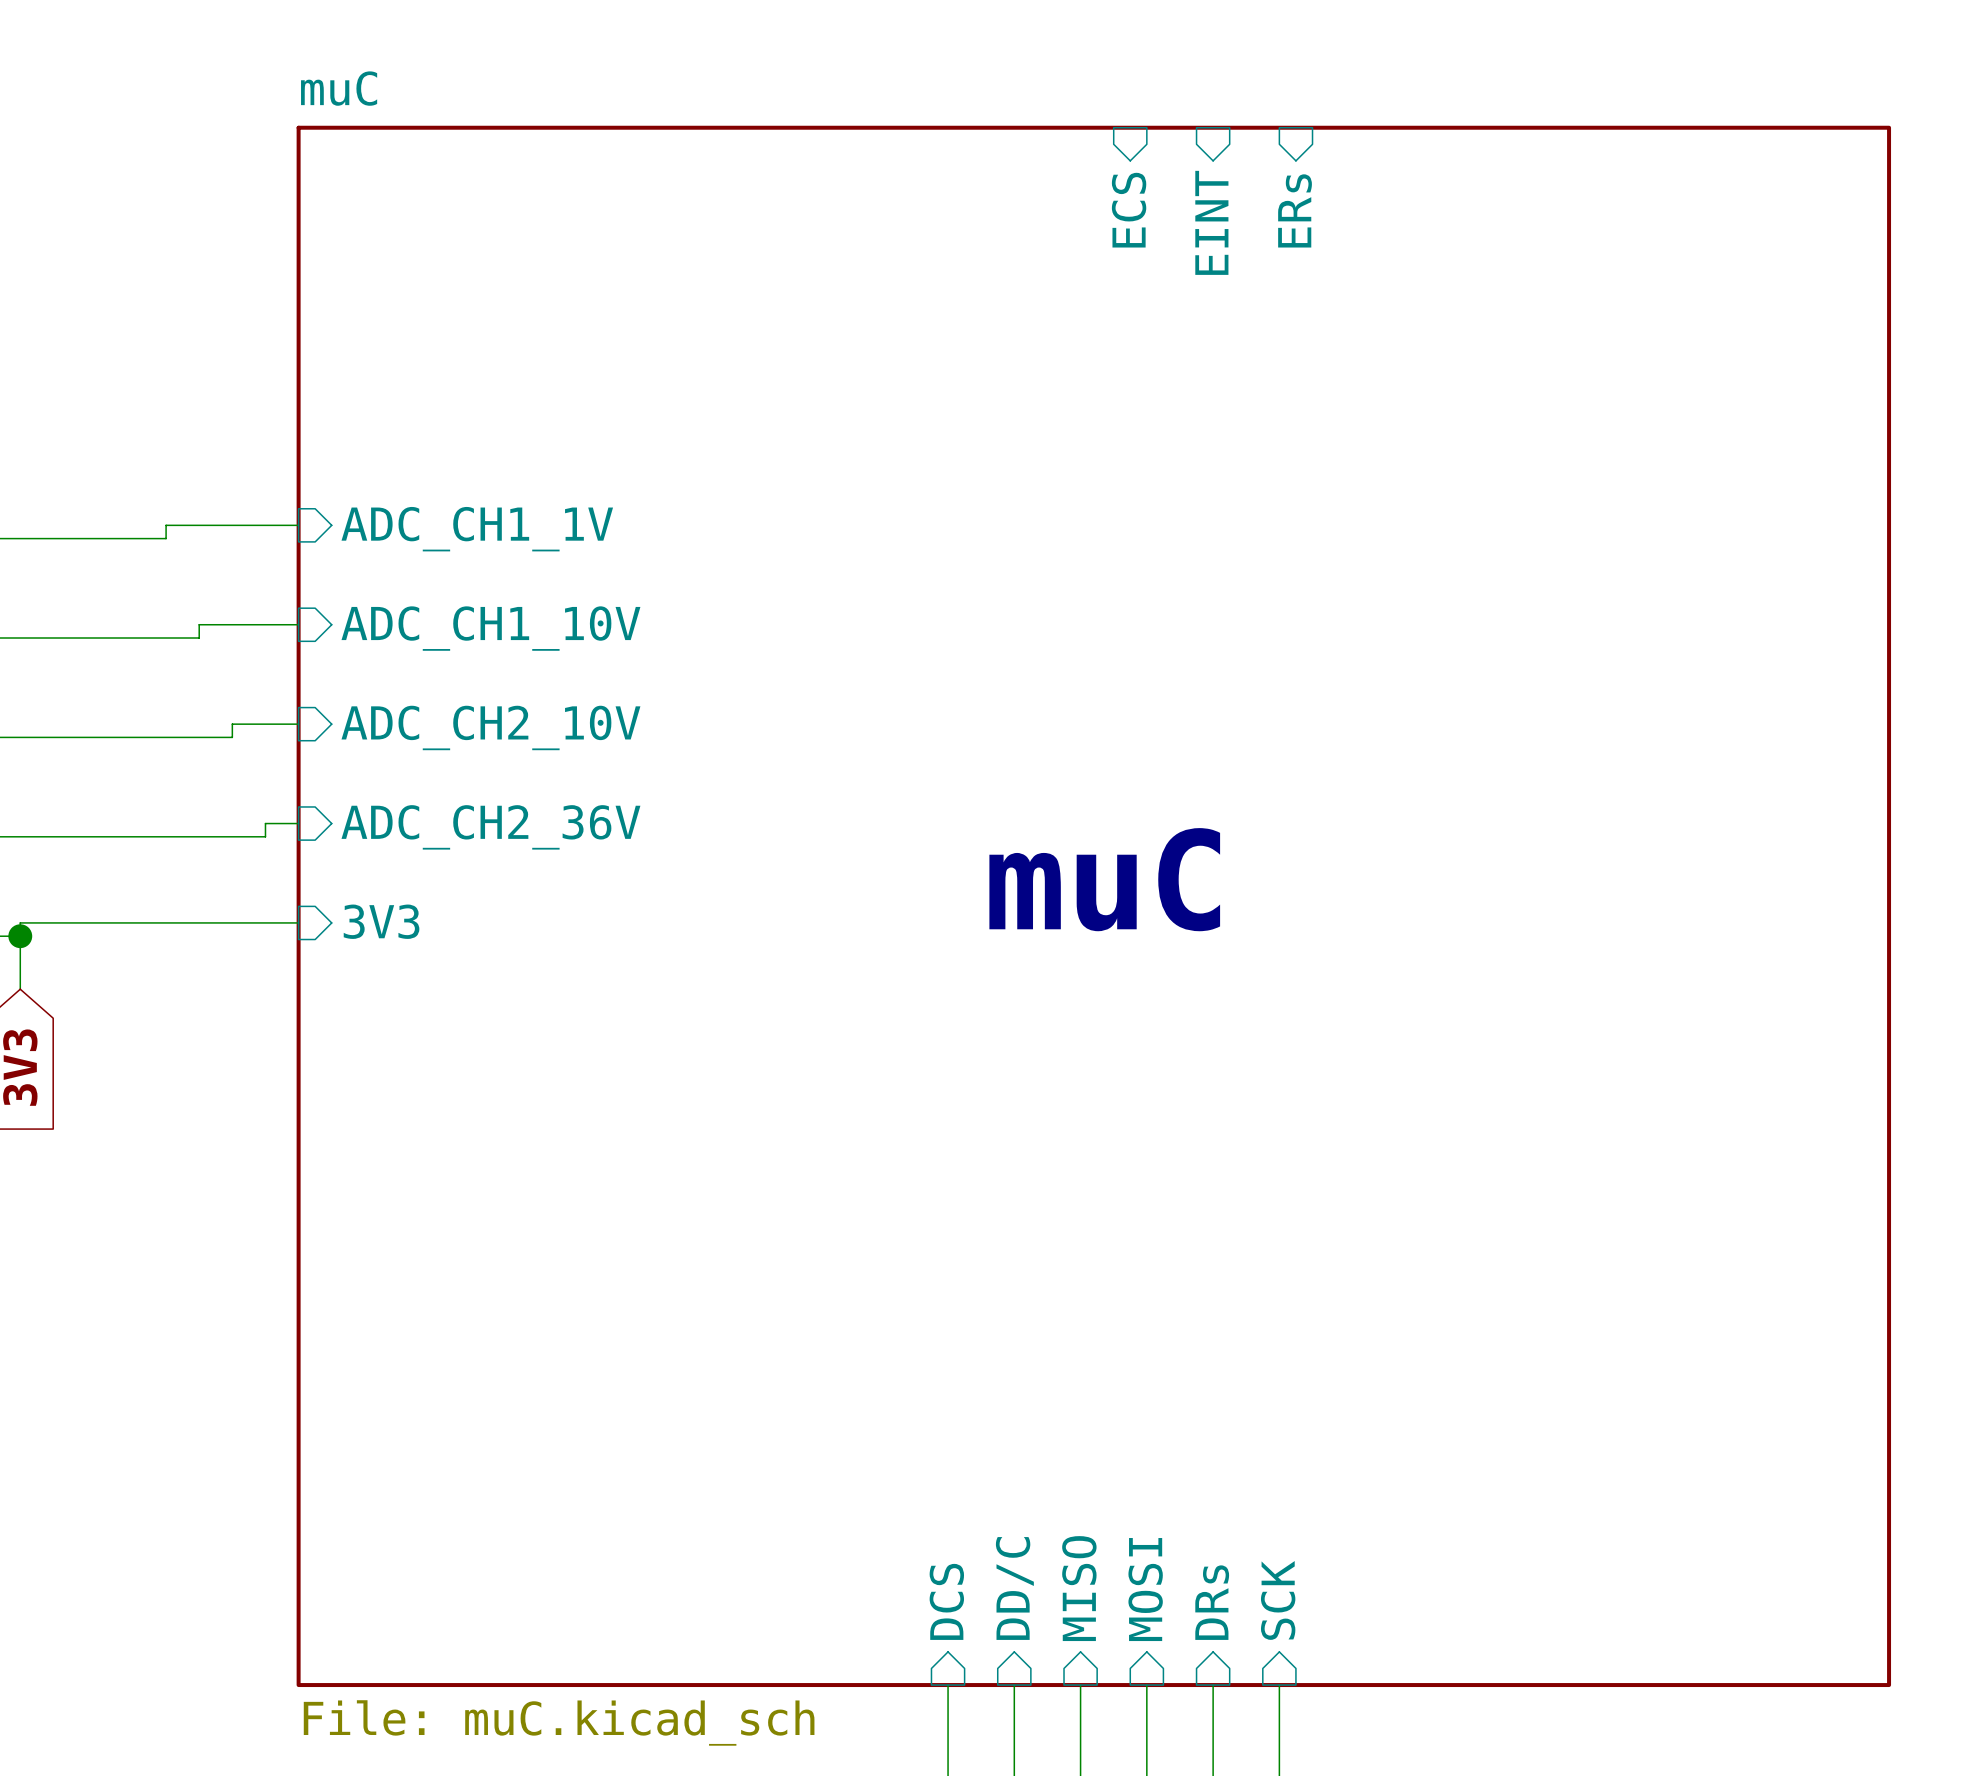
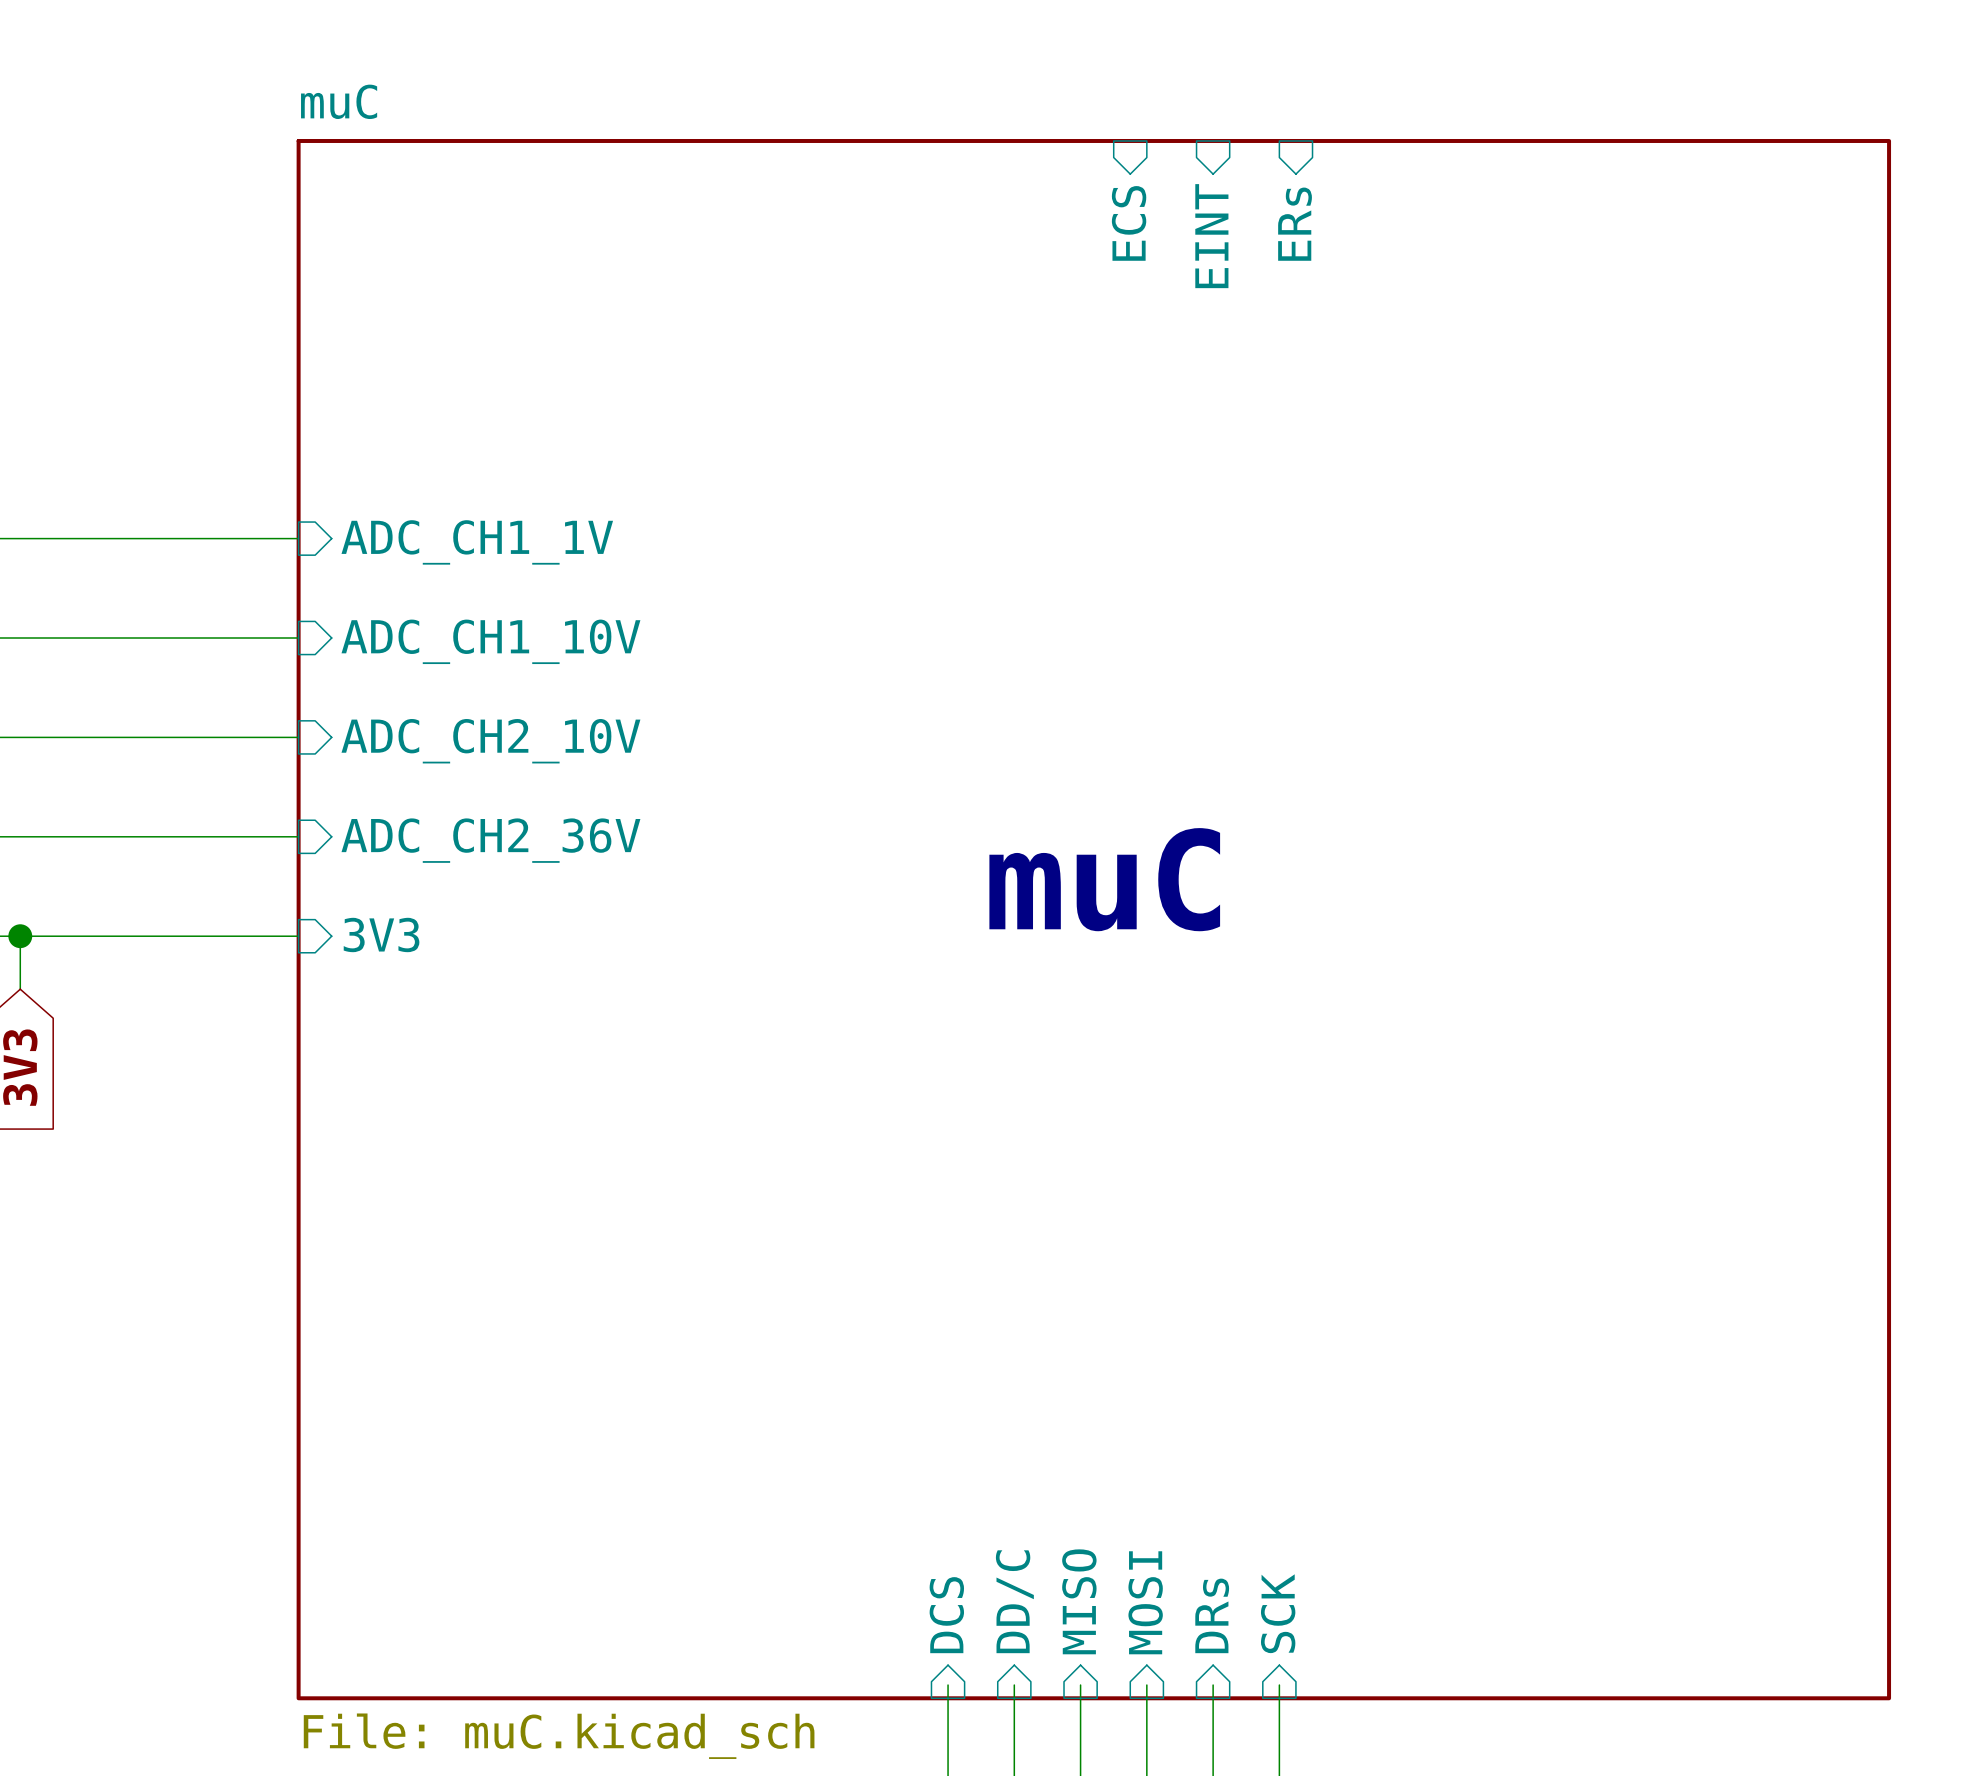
sheet pin position: ECS (1129, 210) -> ECS (1129, 223)
sheet pin position: ERs (1295, 210) -> ERs (1295, 224)
sheet pin position: EINT (1211, 222) -> EINT (1211, 236)
wire: (298, 525) (166, 525) (166, 538) -> (298, 538) (166, 538)
sheet pin position: ADC_CH1_1V (477, 529) -> ADC_CH1_1V (477, 542)
wire: (298, 624) (199, 624) (199, 638) -> (298, 638) (199, 638)
sheet pin position: ADC_CH1_10V (490, 628) -> ADC_CH1_10V (490, 641)
wire: (298, 724) (232, 724) (232, 737) -> (298, 737) (232, 737)
sheet pin position: ADC_CH2_10V (490, 727) -> ADC_CH2_10V (490, 741)
wire: (298, 823) (265, 823) (265, 836) -> (298, 836) (265, 836)
sheet pin position: ADC_CH2_36V (490, 827) -> ADC_CH2_36V (490, 840)
sheet muC position: (1093, 906) -> (1093, 919)
sheet pin position: 3V3 (381, 921) -> 3V3 (381, 934)
wire: (298, 922) (20, 922) (20, 936) -> (298, 936) (20, 936)
sheet pin position: DD/C (1014, 1588) -> DD/C (1014, 1601)
sheet pin position: MISO (1079, 1588) -> MISO (1079, 1601)
sheet pin position: MOSI (1145, 1589) -> MOSI (1145, 1602)
sheet pin position: SCK (1278, 1600) -> SCK (1278, 1613)
sheet pin position: DCS (946, 1601) -> DCS (946, 1615)
sheet pin position: DRs (1212, 1602) -> DRs (1212, 1615)

